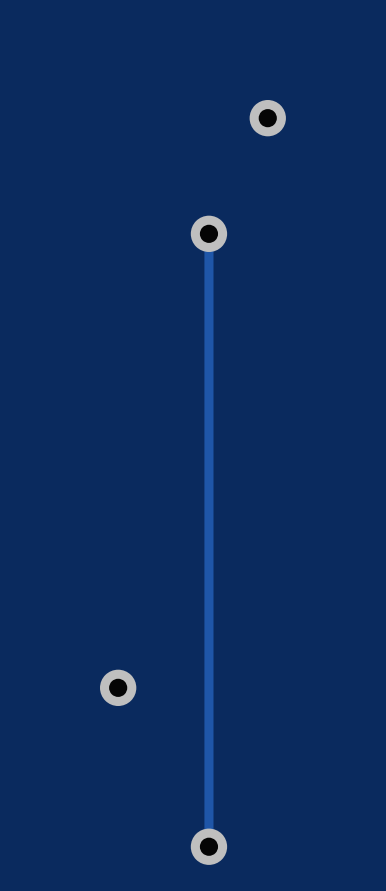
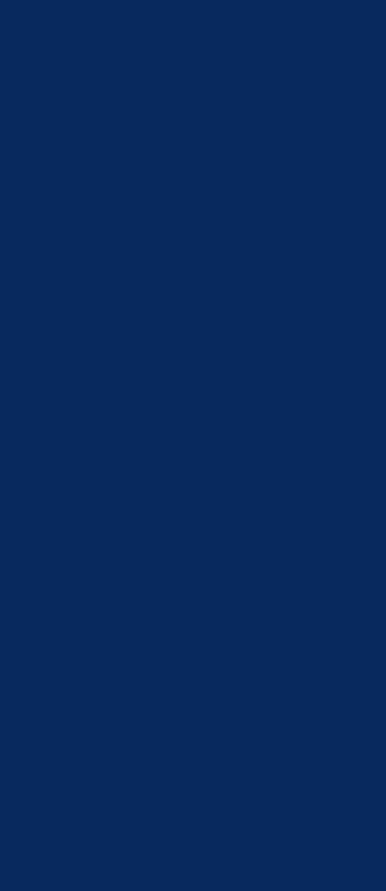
via: (267, 118) -> none
track: (208, 233) (208, 846) -> none
via: (208, 233) -> none
via: (118, 687) -> none
via: (208, 846) -> none

